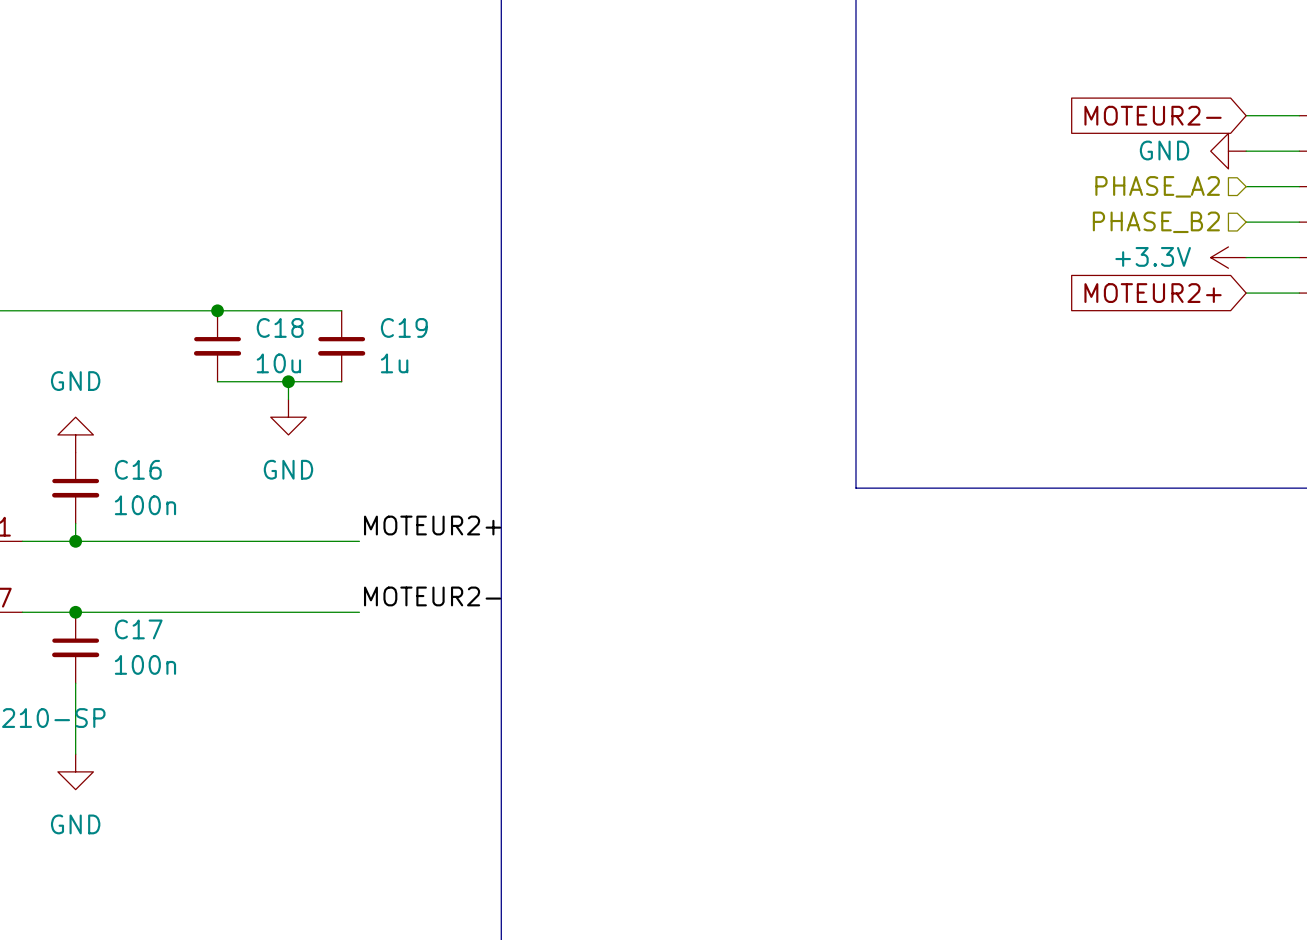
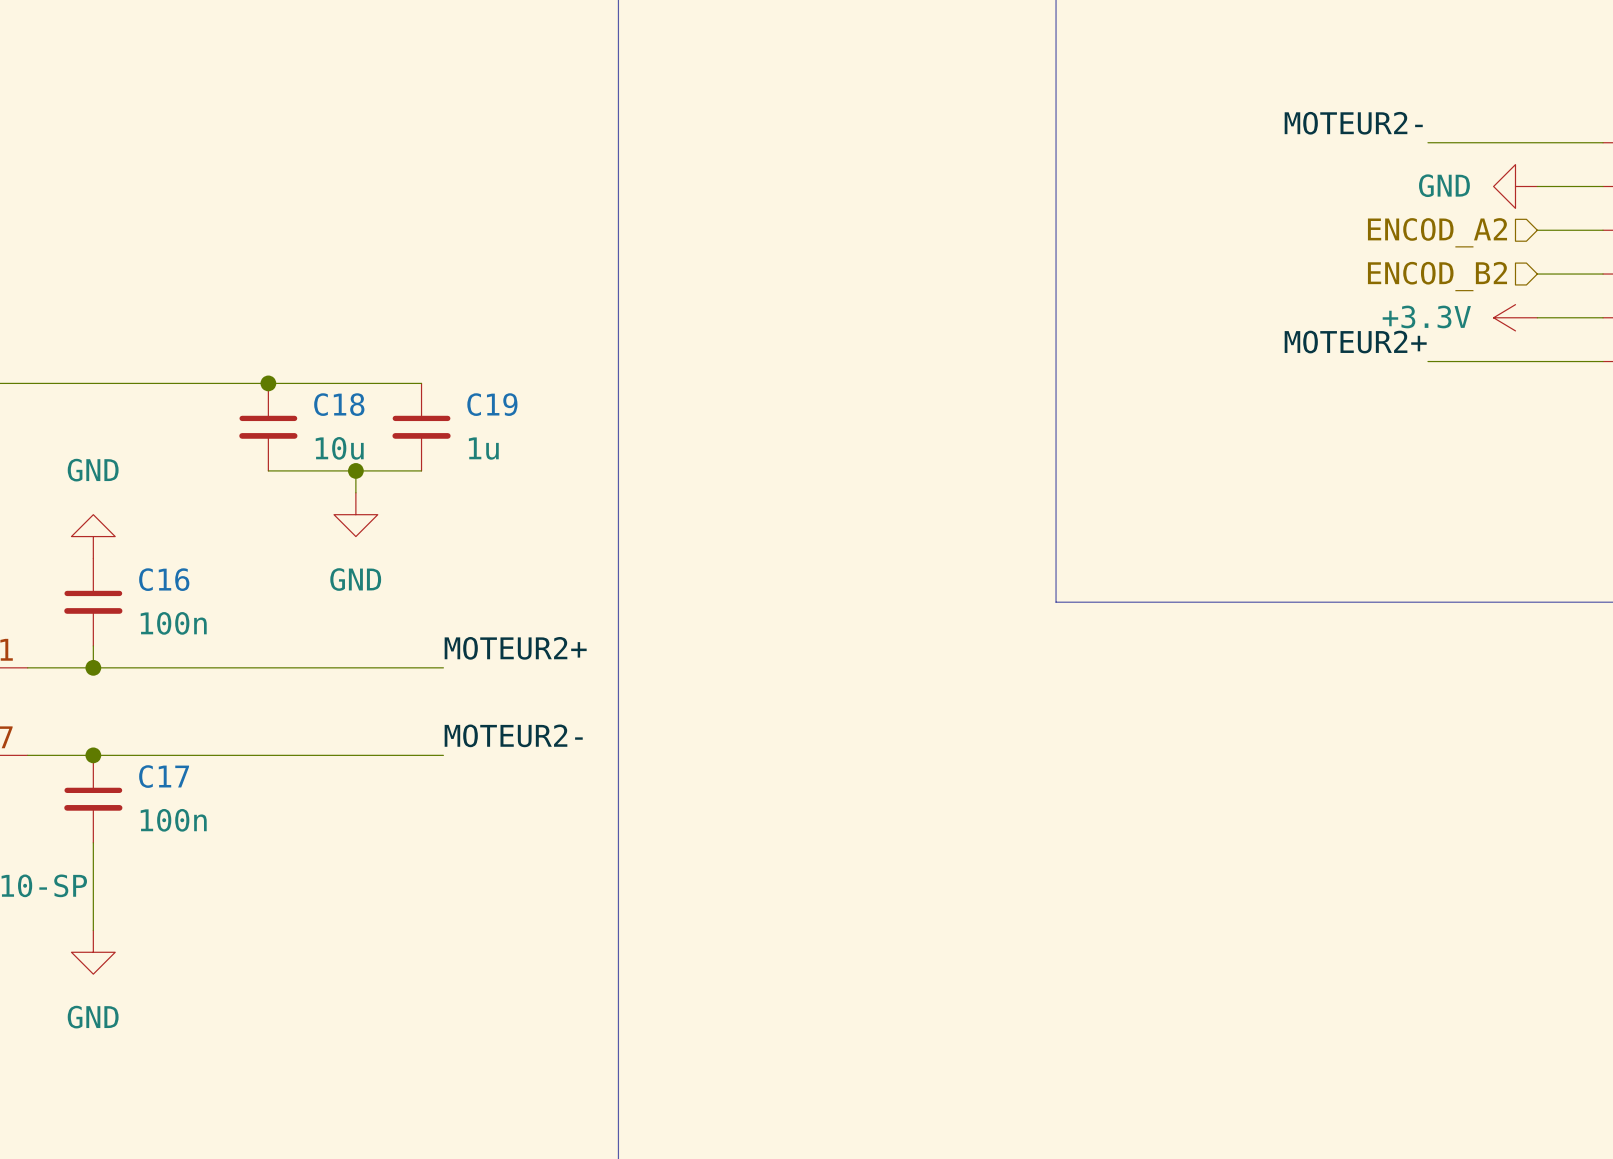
label: none -> MOTEUR2- (1353, 123)
global label: MOTEUR2- (1153, 115) -> none
wire: none -> (1427, 142) (1537, 142)
hierarchical label: PHASE_A2 (1157, 186) -> ENCOD_A2 (1437, 232)
hierarchical label: PHASE_B2 (1156, 222) -> ENCOD_B2 (1437, 276)
label: none -> MOTEUR2+ (1355, 342)
global label: MOTEUR2+ (1153, 293) -> none
wire: none -> (1427, 361) (1537, 361)

